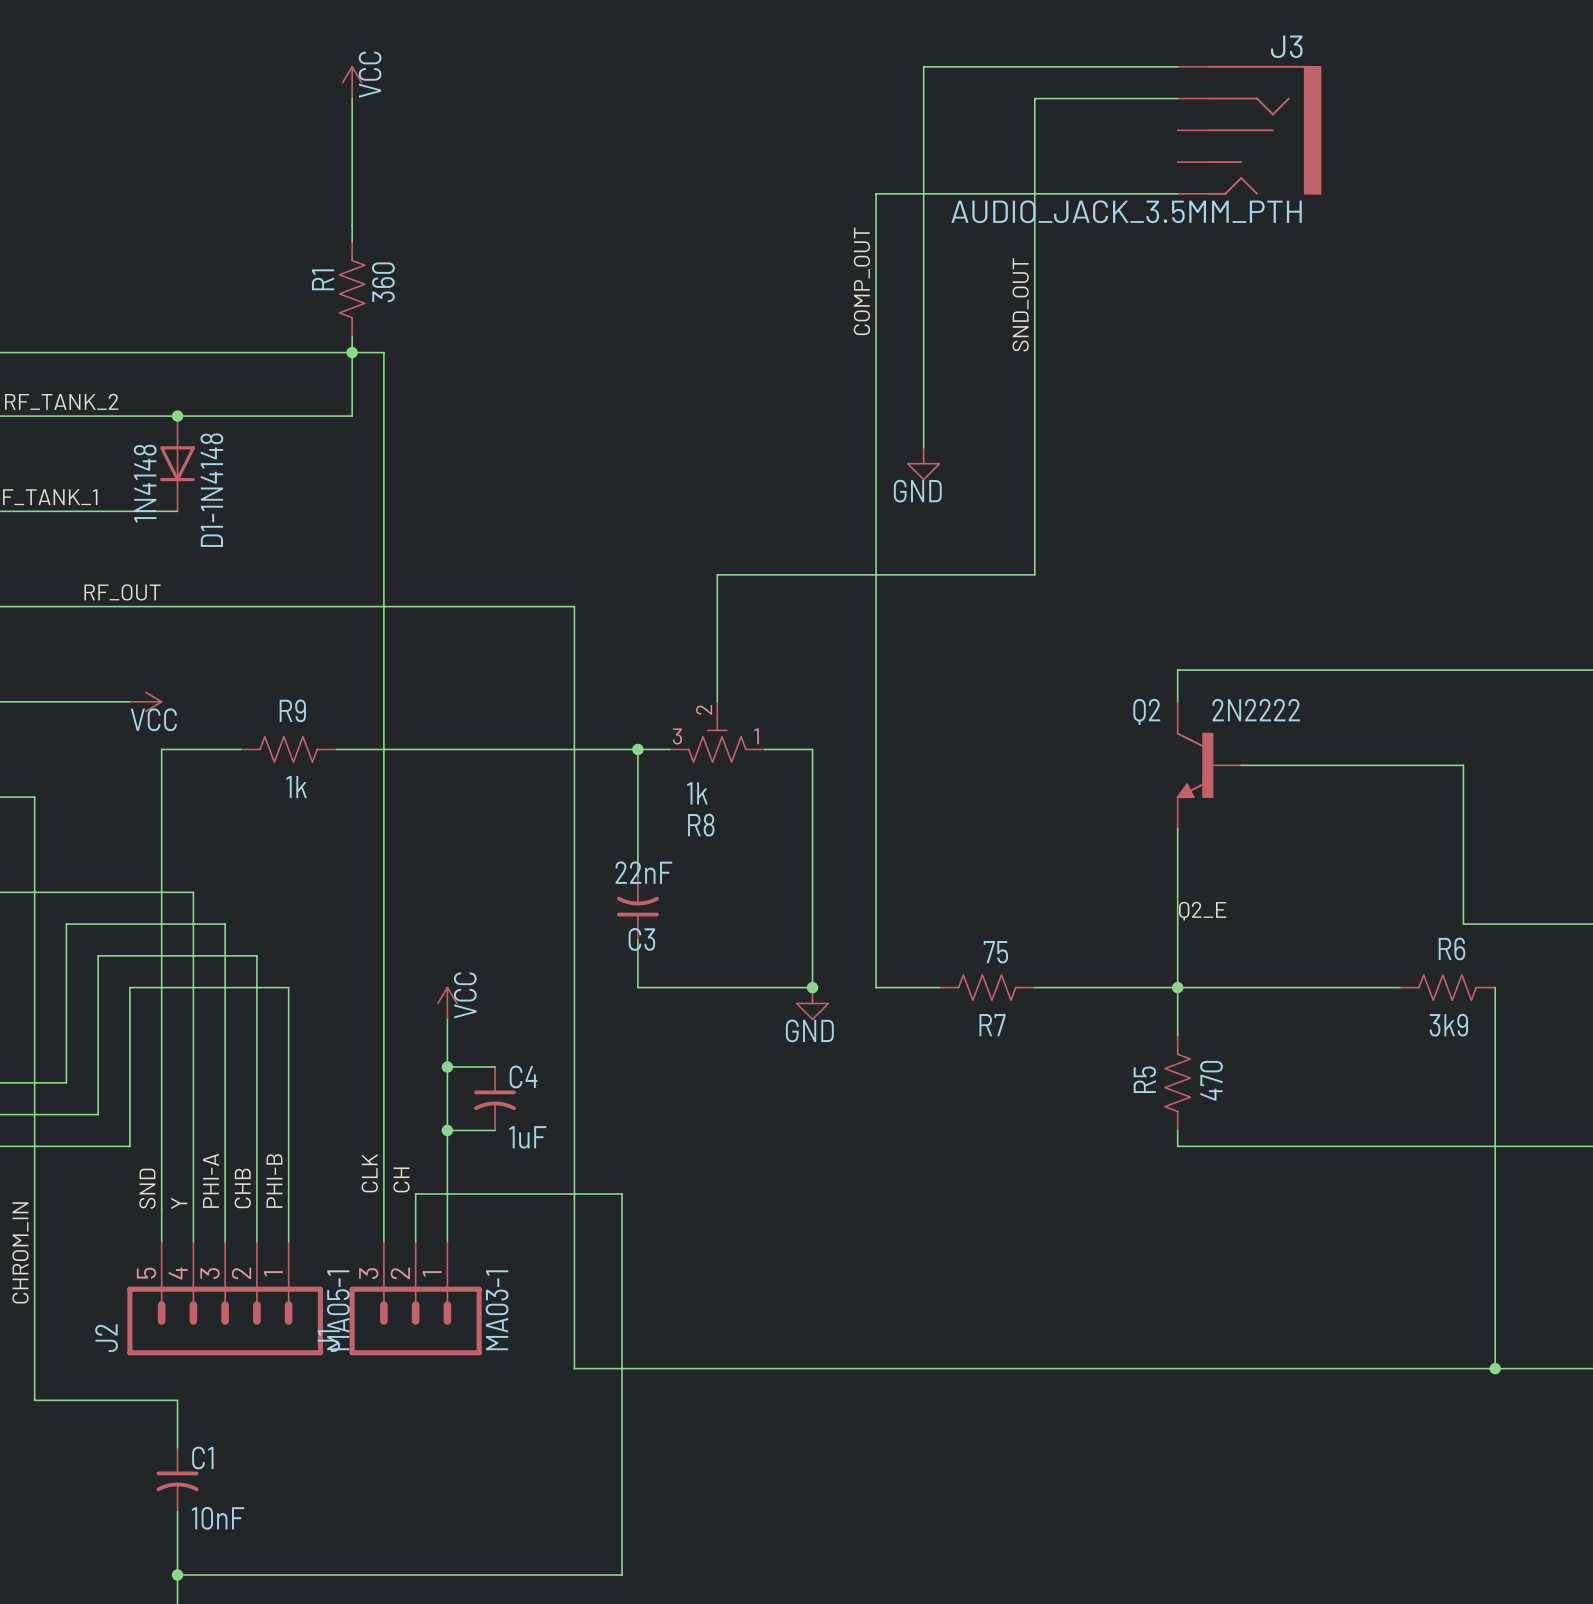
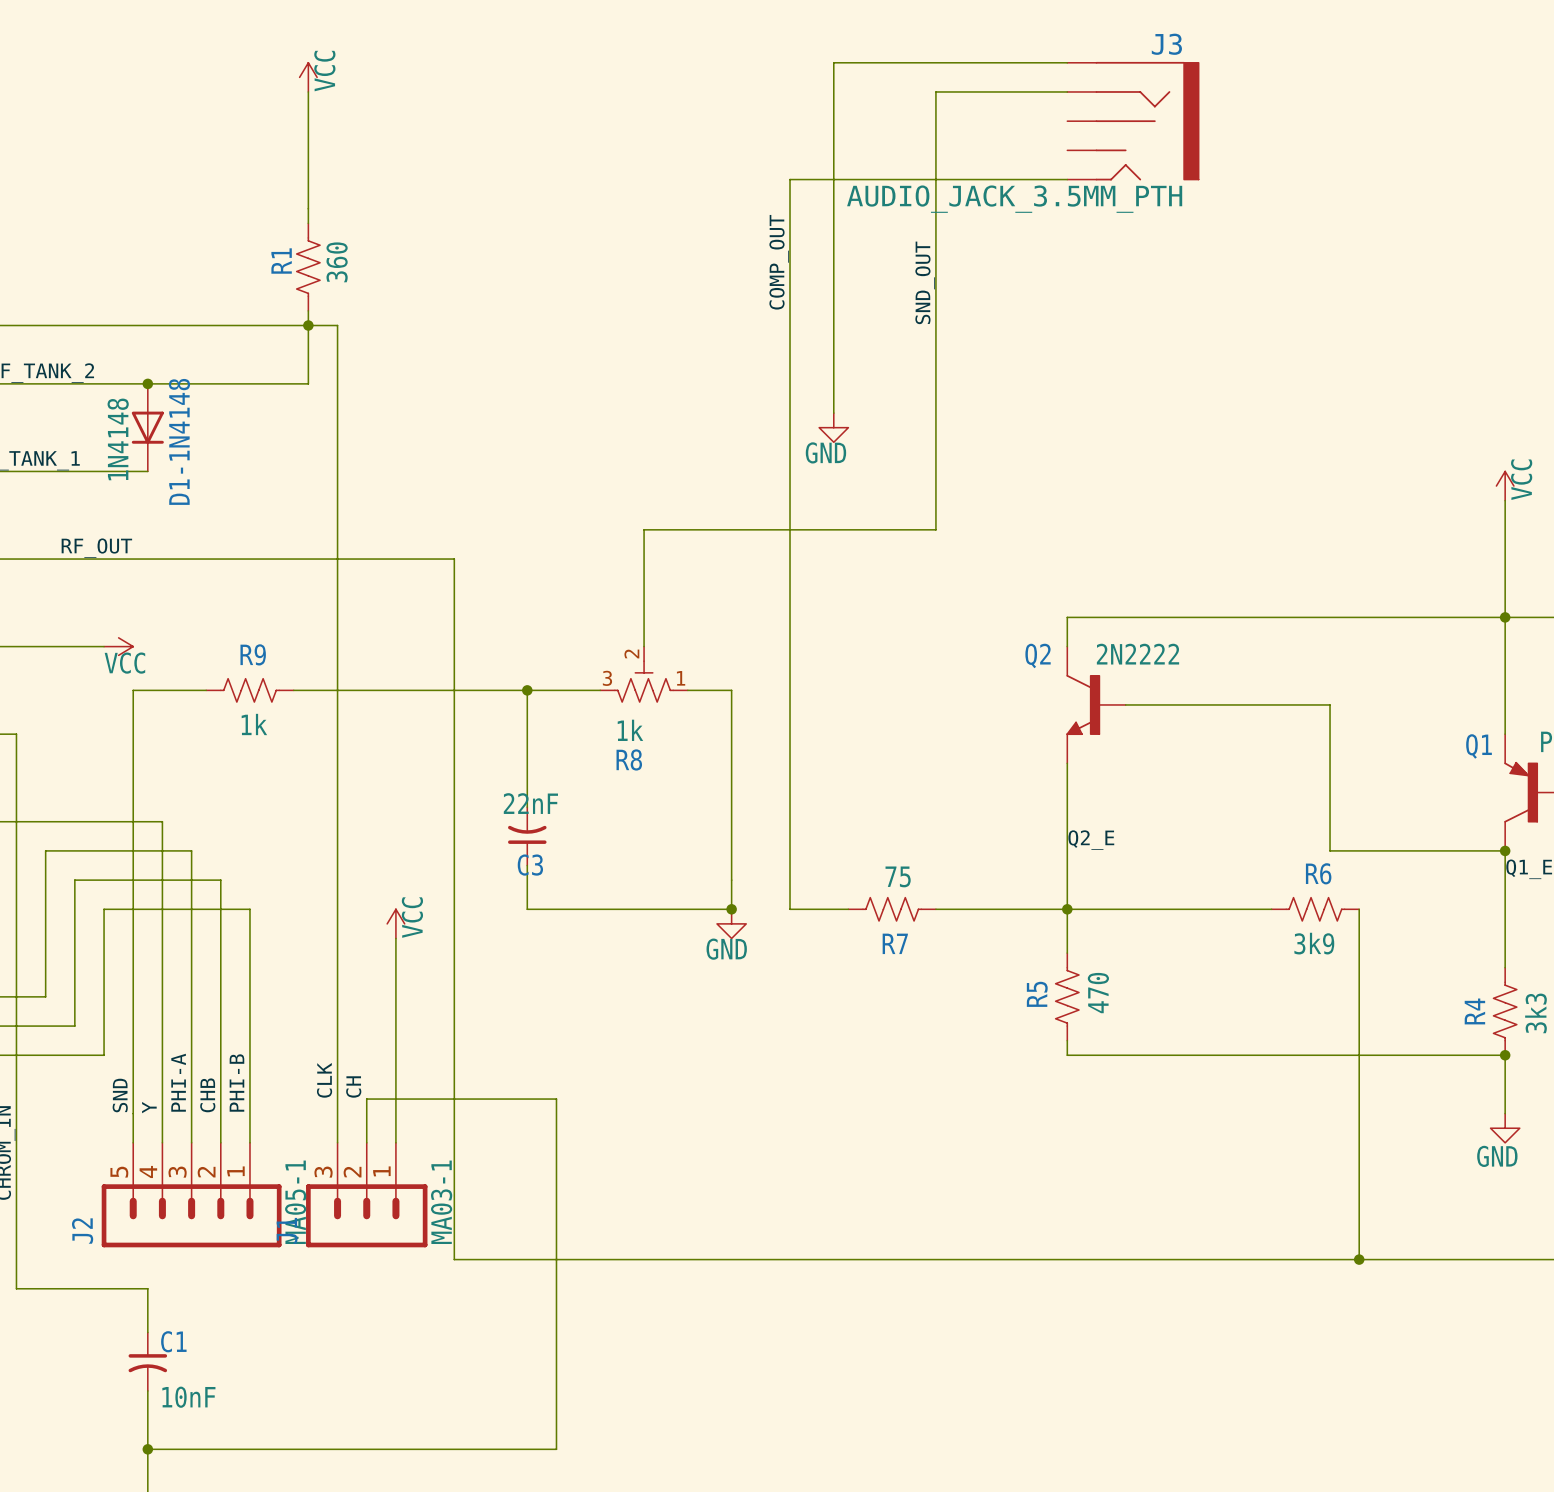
wire: (510, 606) (574, 606) (574, 1368) -> (454, 559) (454, 1259) (512, 1259)
wire: (637, 749) (637, 876) -> (527, 690) (527, 807)
junction position: (637, 749) -> (527, 690)
C3 position: (637, 908) -> (527, 836)
wire: (637, 939) (637, 987) -> (527, 865) (527, 909) (571, 909)
wire: (447, 1066) (495, 1066) -> none
junction: (447, 1066) -> none
C4: 1uF (495, 1098) -> none
wire: (447, 1130) (495, 1130) -> none
junction: (447, 1130) -> none

